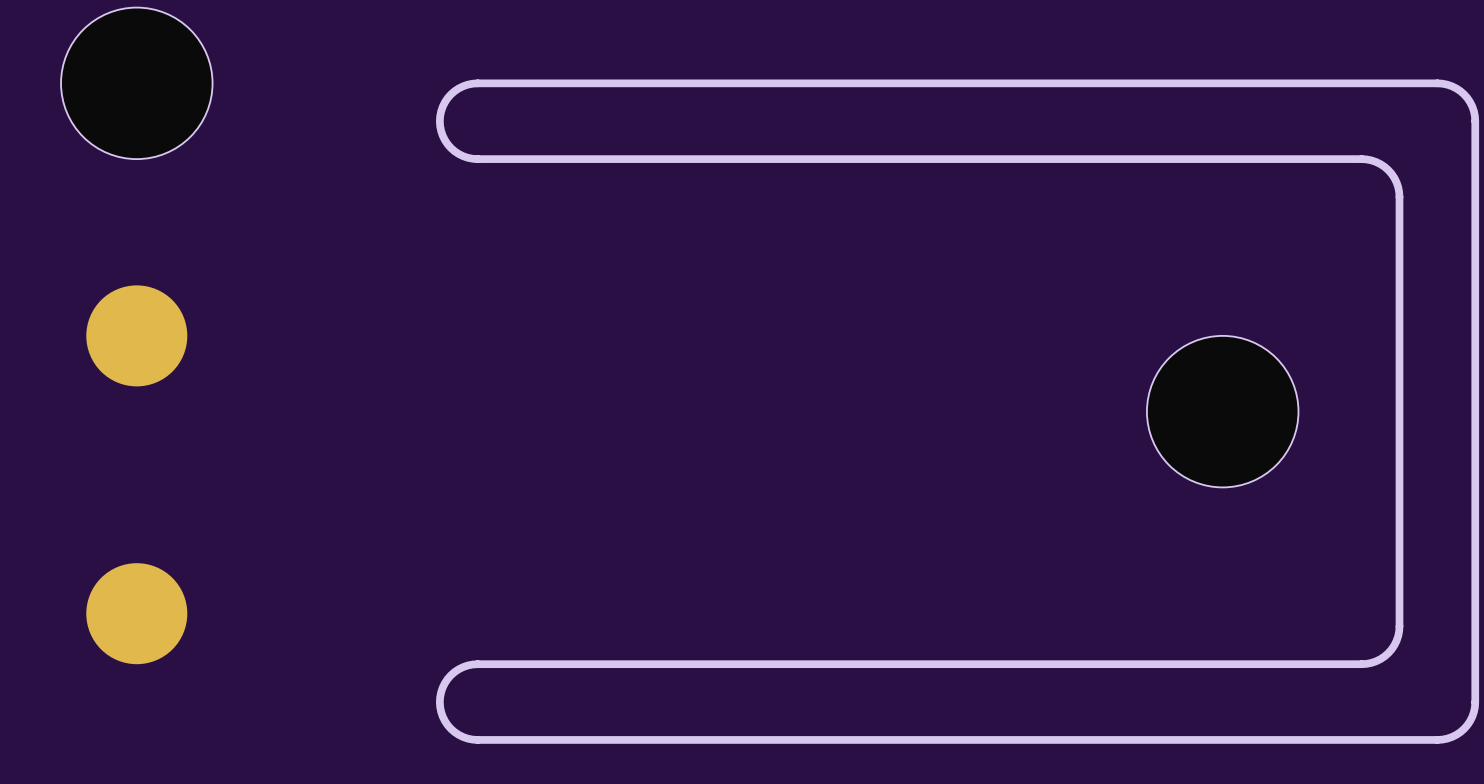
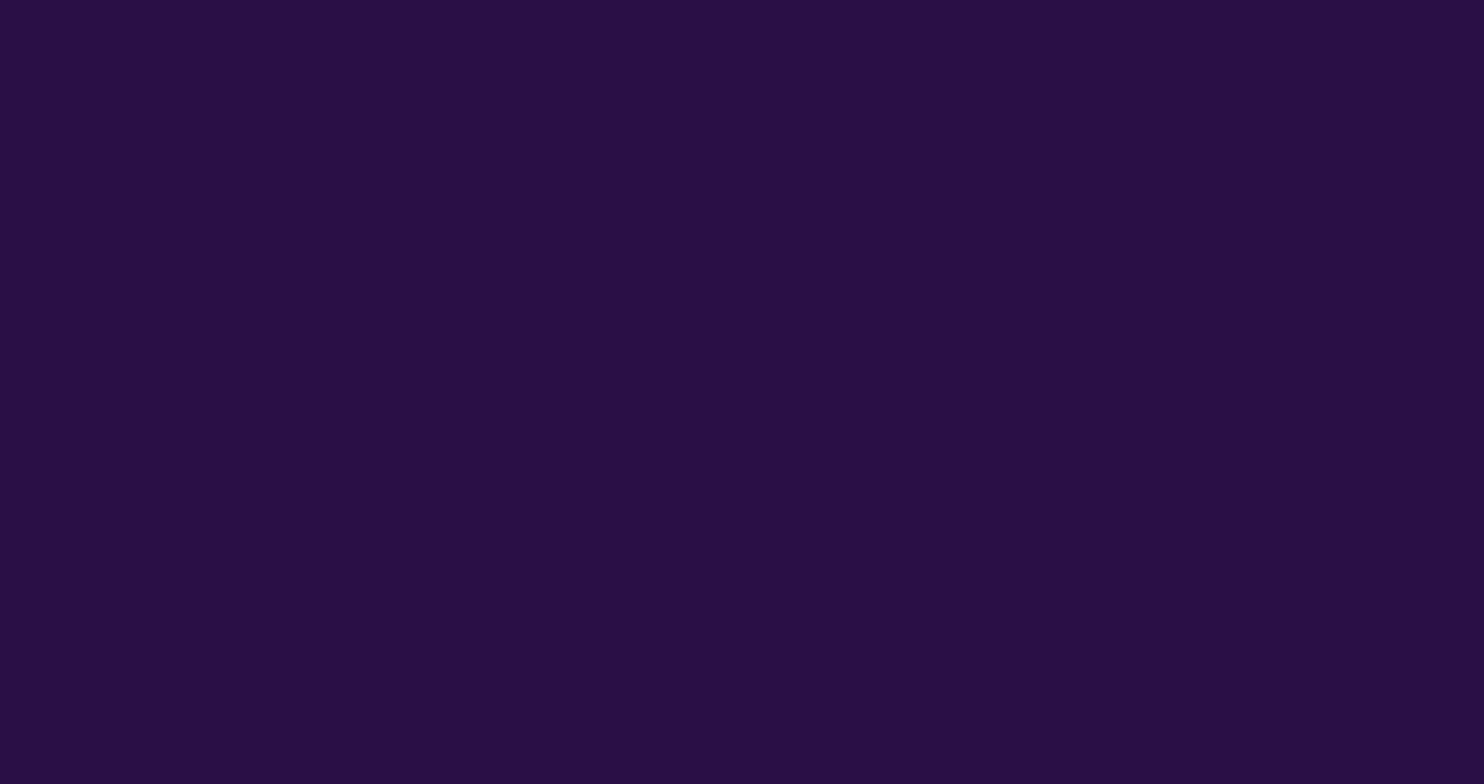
part: (136, 83) -> none
board edge: (1437, 83) (477, 83) (458, 88) (450, 94) (442, 106) (439, 121) (441, 131) (450, 148) (463, 156) (472, 158) (1361, 159) (1380, 164) (1394, 178) (1399, 196) (1399, 626) (1396, 640) (1388, 653) (1376, 661) (1361, 664) (472, 664) (454, 672) (444, 683) (439, 702) (444, 721) (458, 734) (477, 739) (1437, 739) (1456, 734) (1470, 721) (1475, 702) (1475, 121) (1472, 106) (1464, 94) (1451, 86) (1437, 83) -> none
part: (136, 335) -> none
part: (1222, 411) -> none
part: (136, 613) -> none

